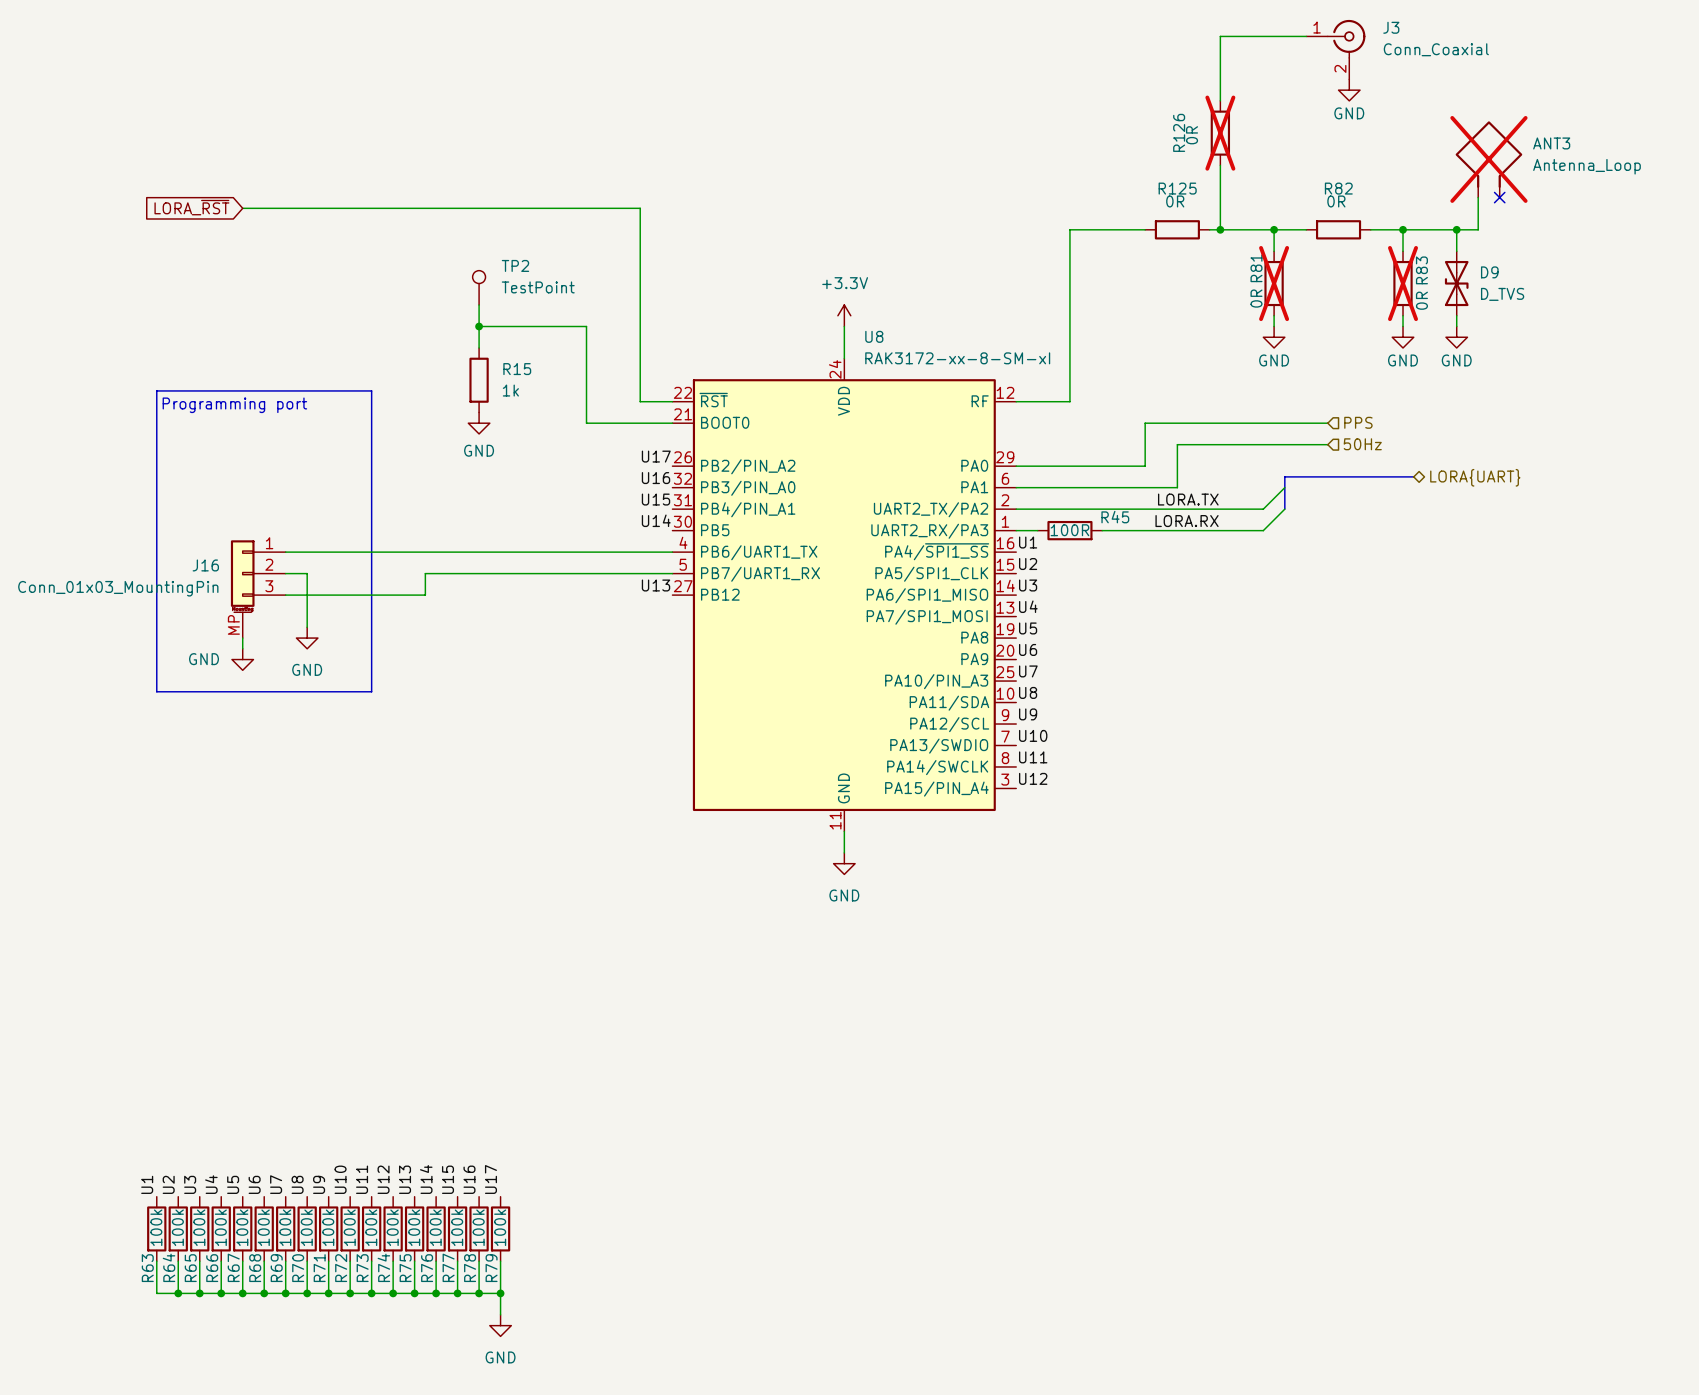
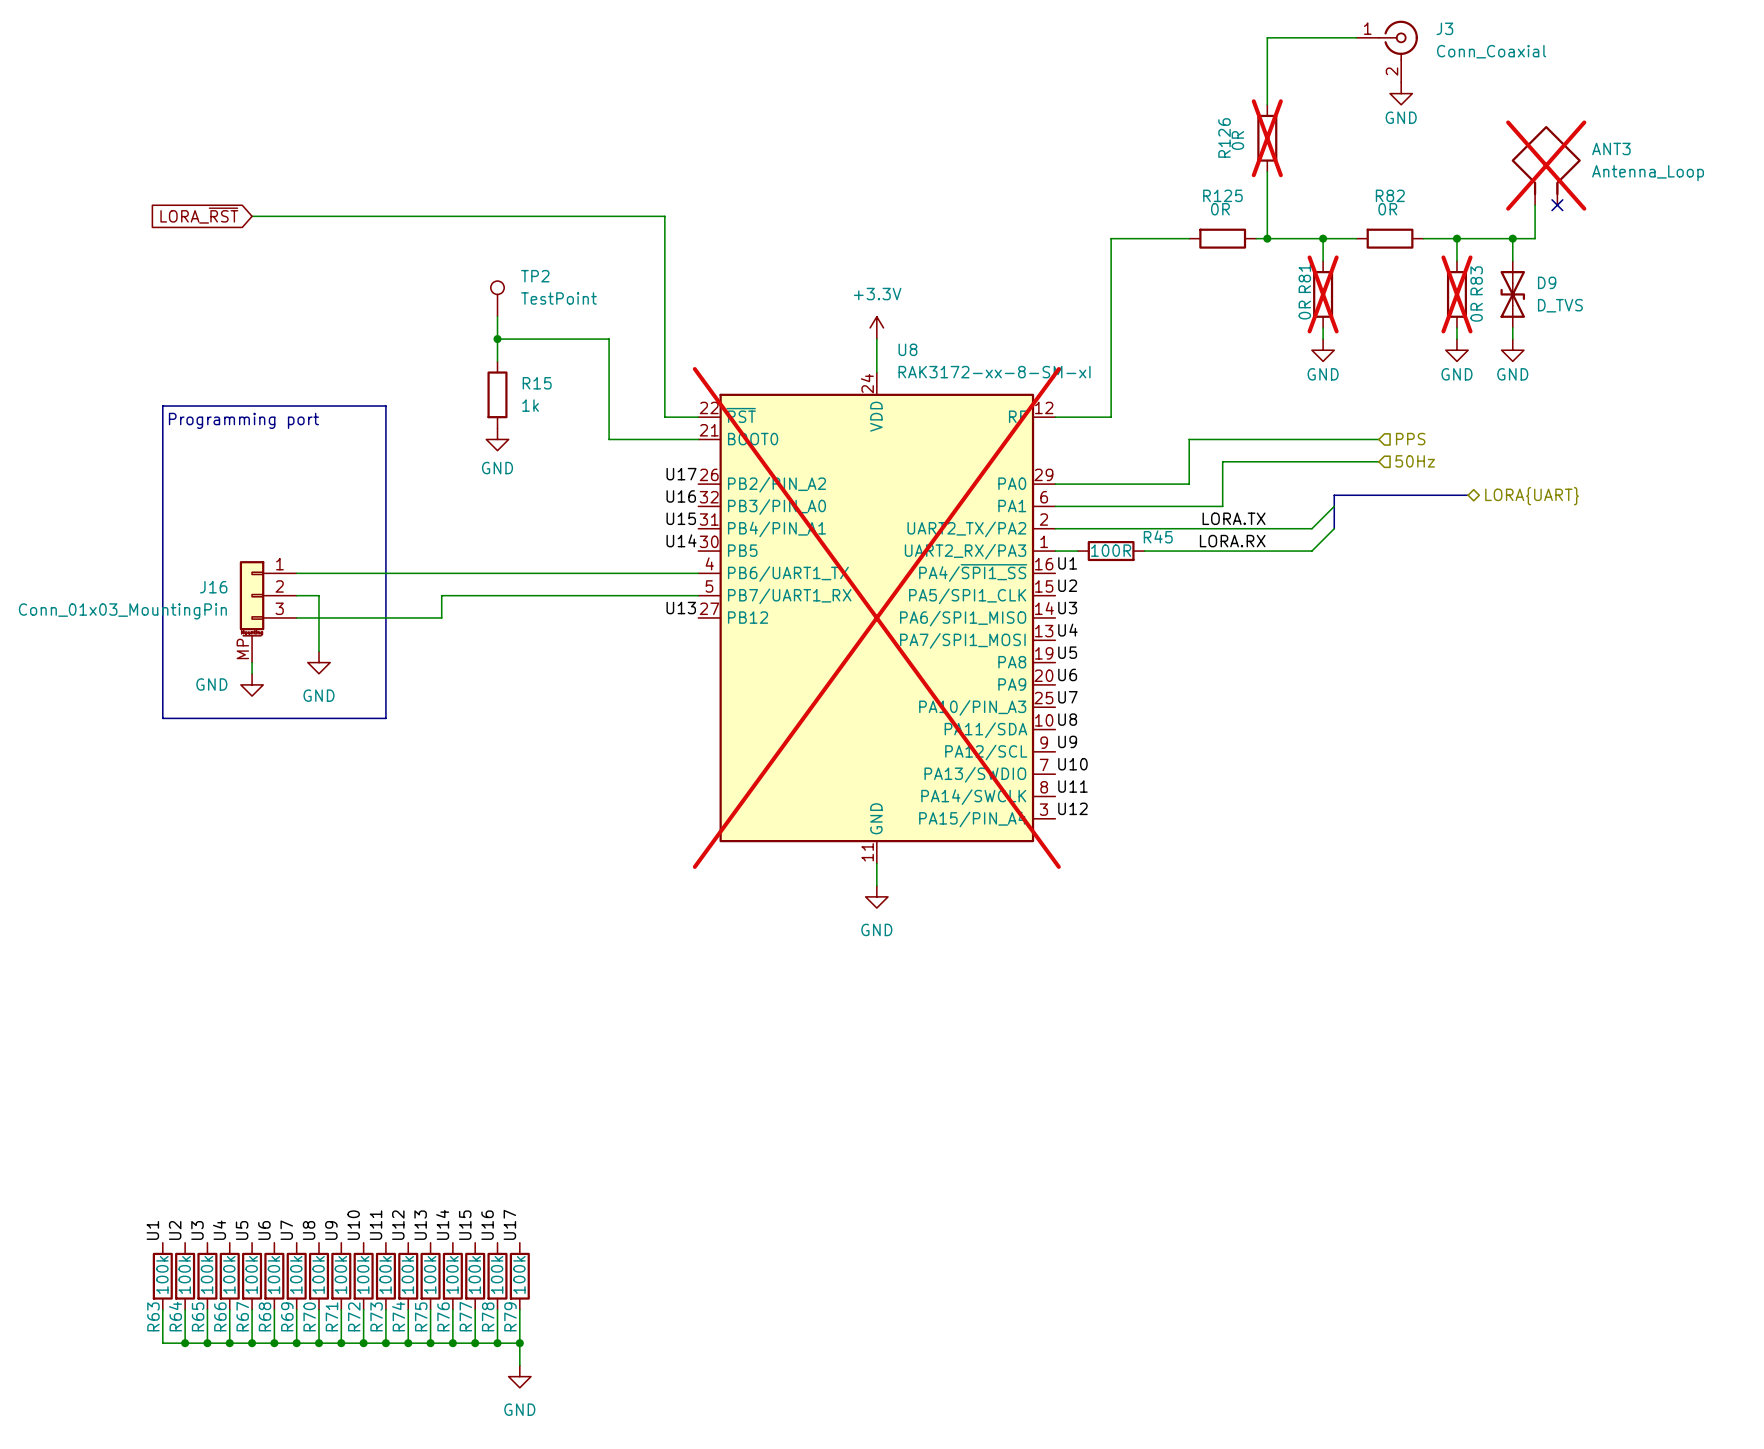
U8 do-not-place cross: none -> (876, 617)

